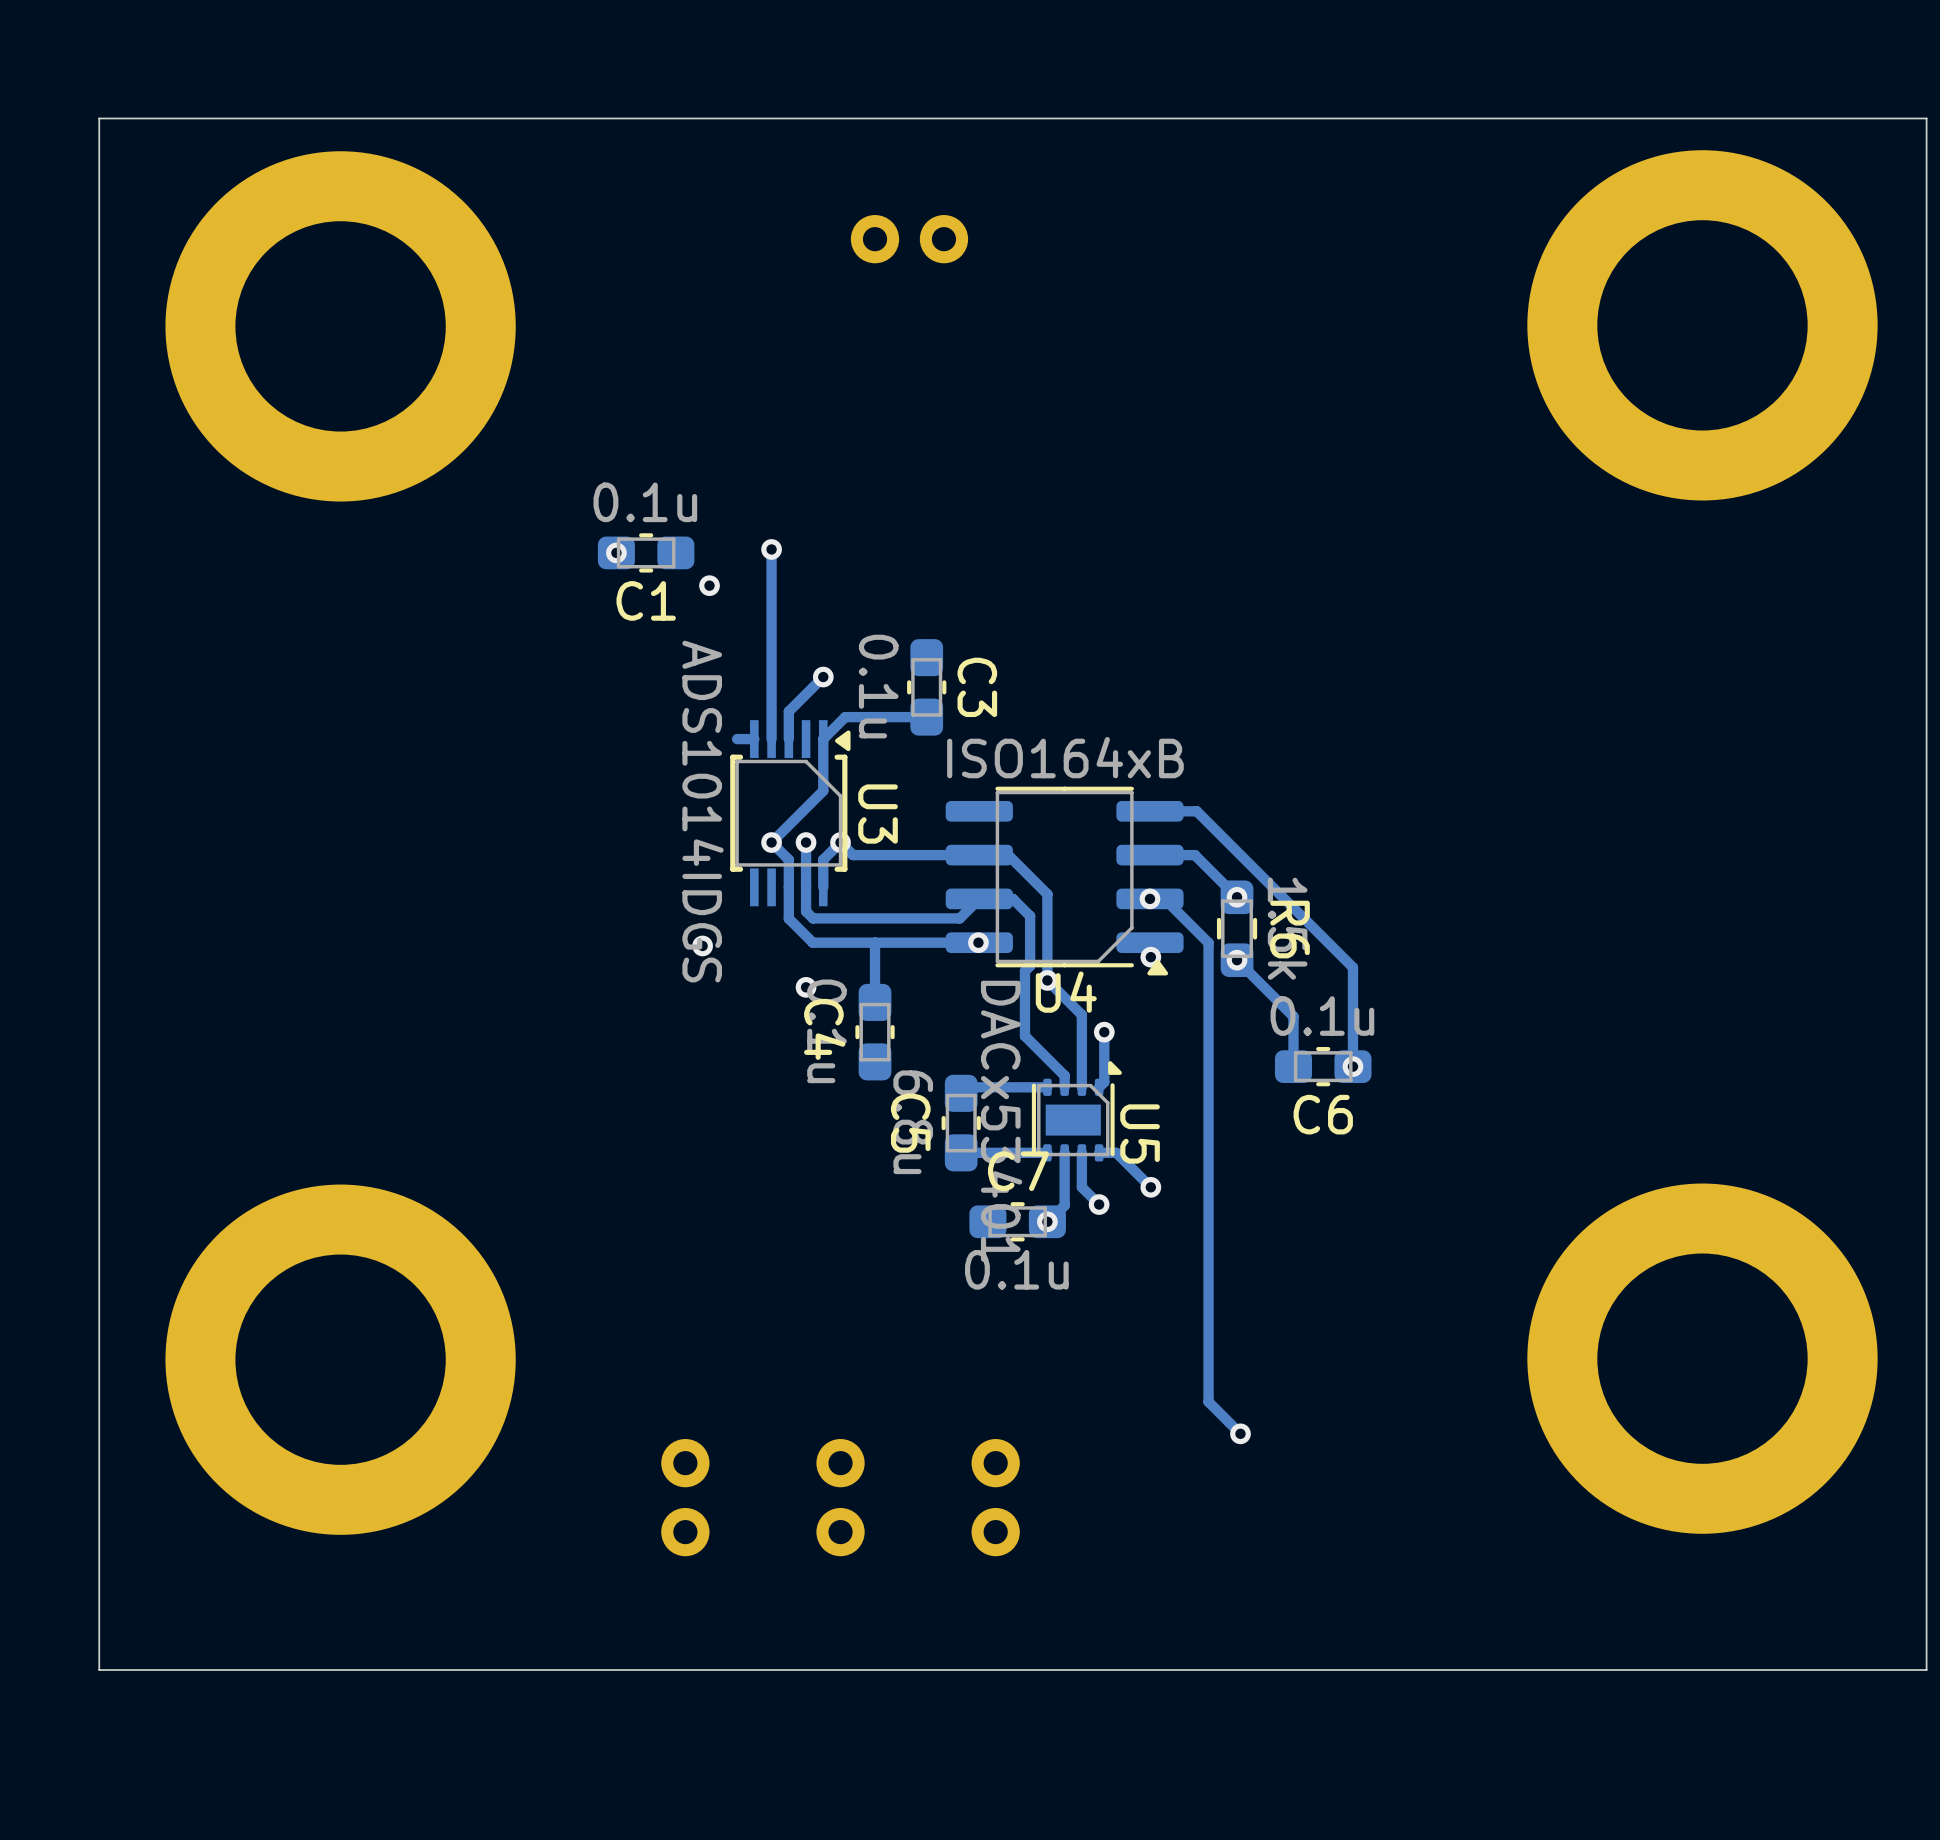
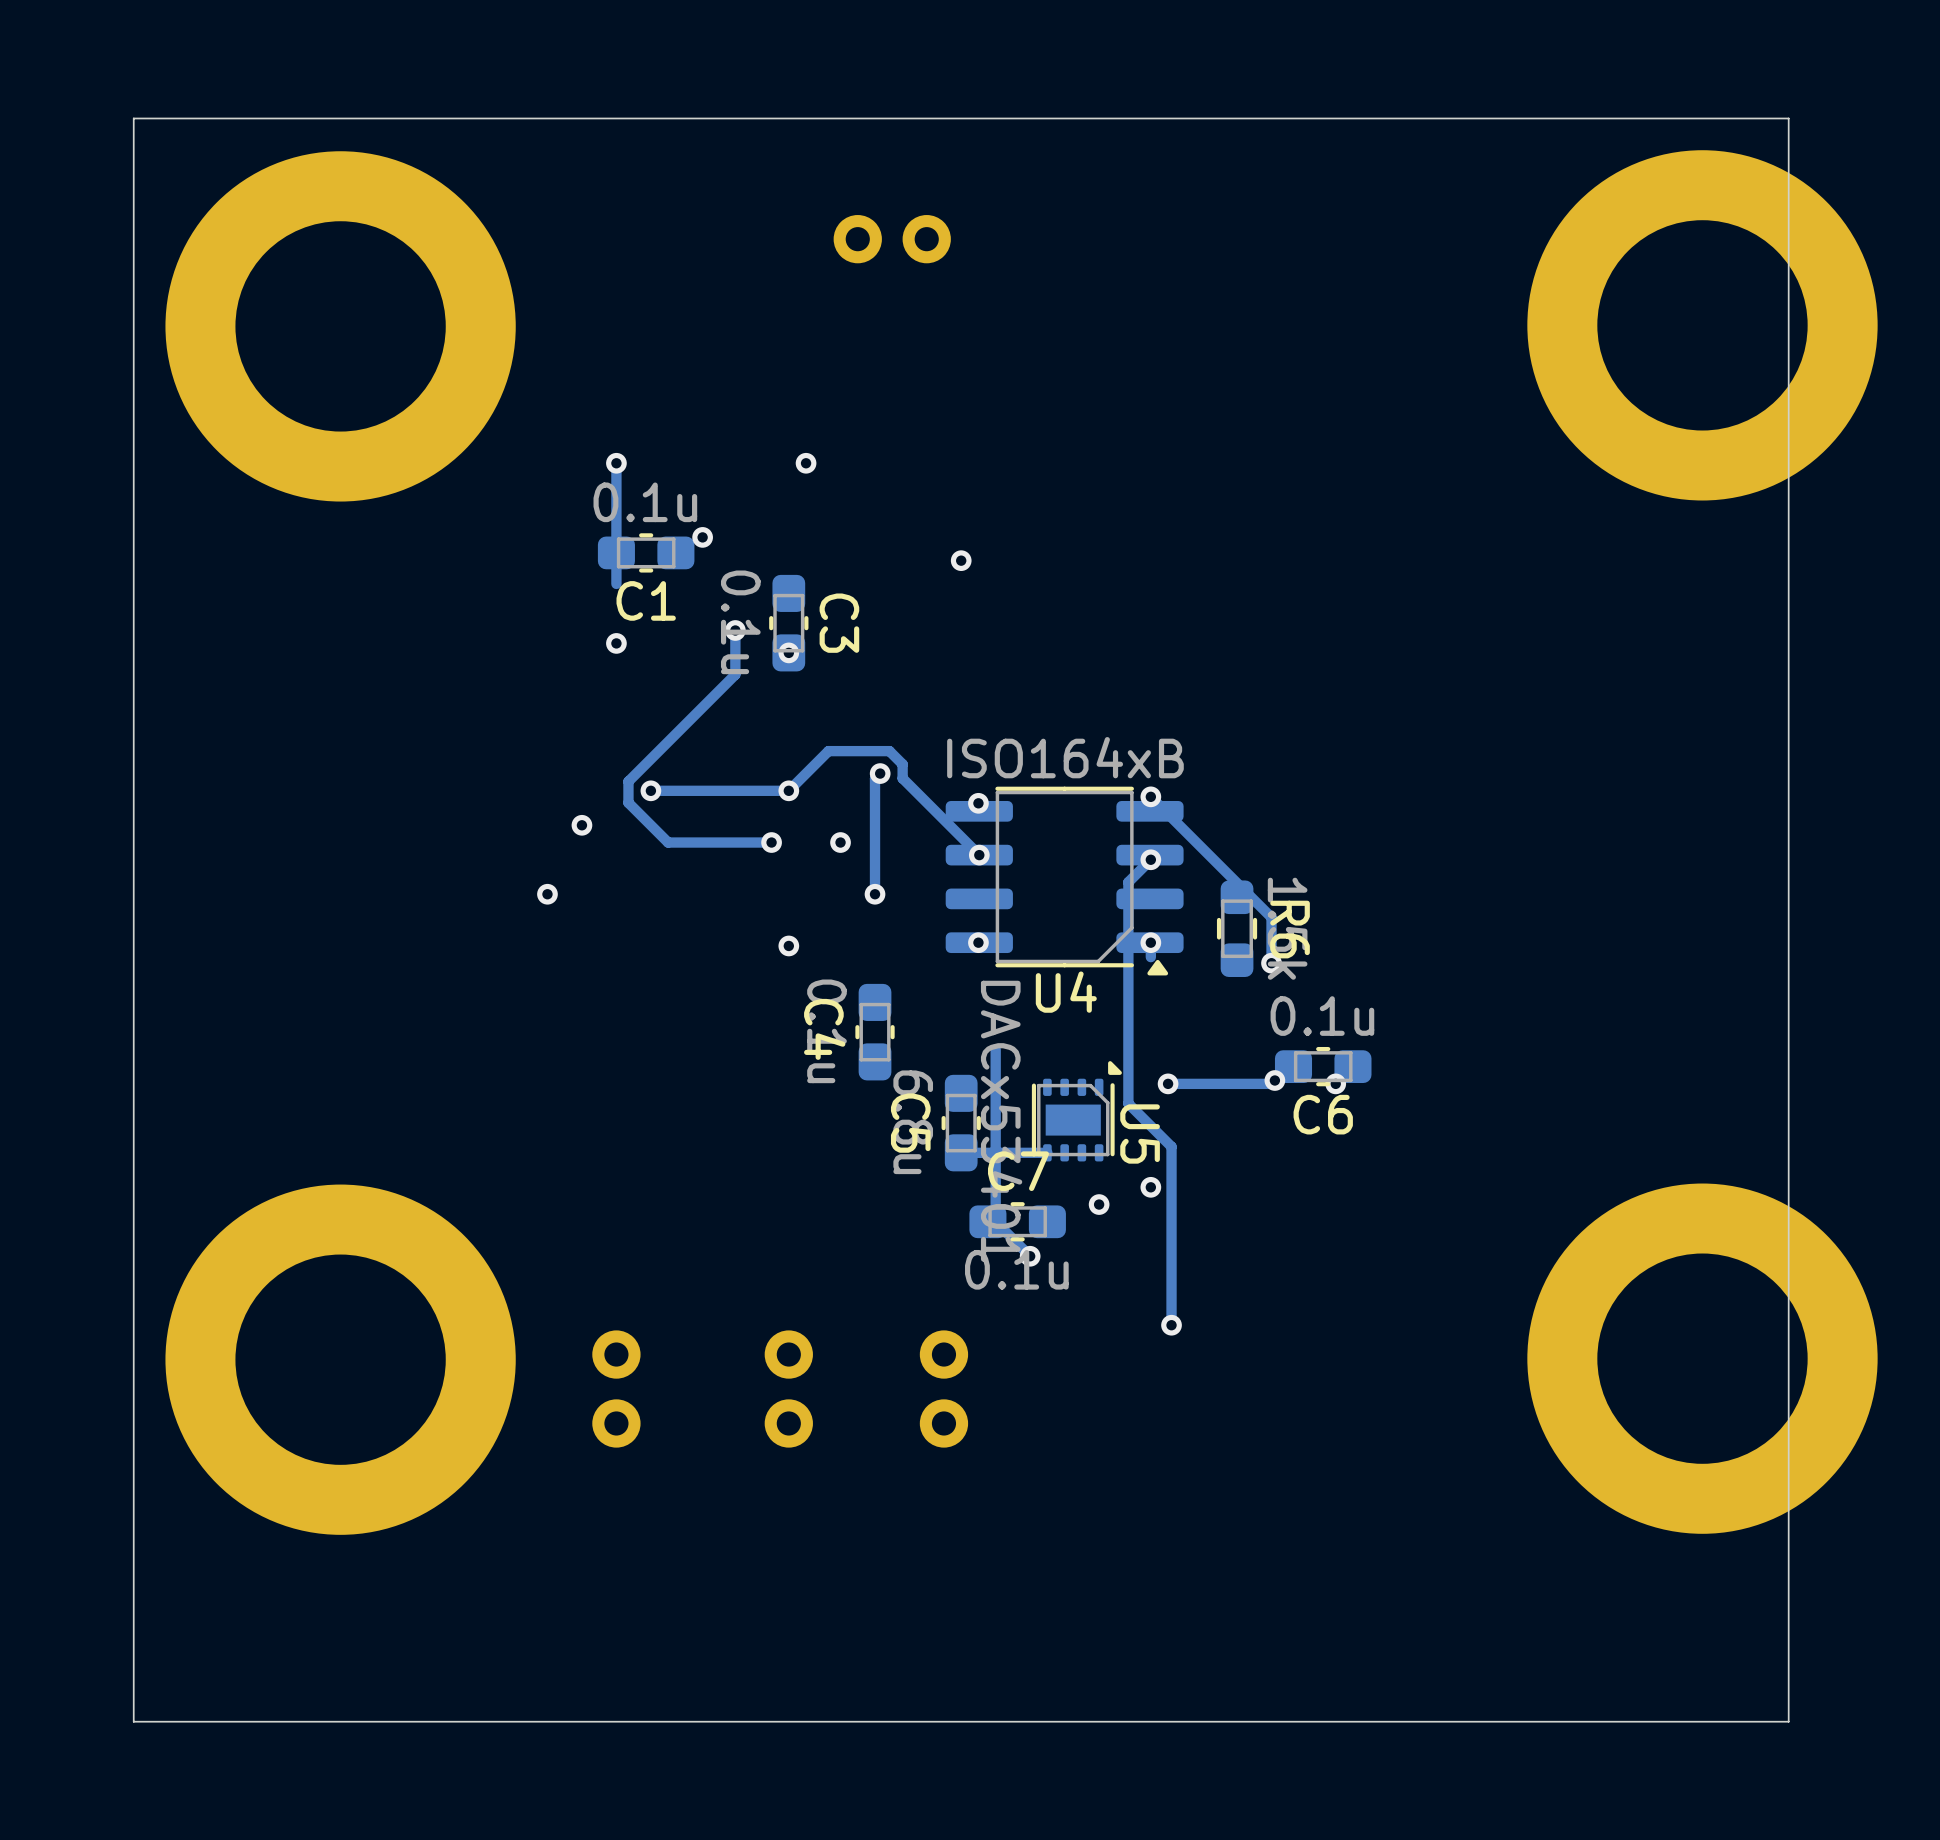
board edge: (1788, 118) (1926, 118) (1926, 1670) (99, 1670) (99, 118) (133, 118) -> (1788, 118) (1788, 1721) (133, 1721) (133, 118)
part position: (909, 239) -> (892, 239)
track: none -> (616, 463) (616, 583)
via: none -> (616, 463)
via: none -> (806, 463)
via: none -> (702, 537)
track: (771, 549) (771, 739) -> none
via: (771, 549) -> none
via: (616, 552) -> none
via: none -> (961, 560)
via: (709, 585) -> none
track: none -> (735, 630) (735, 674) (628, 781) (628, 802) (668, 842) (771, 842)
via: none -> (735, 630)
via: none -> (616, 643)
track: (823, 677) (788, 711) (788, 739) -> none
via position: (823, 677) -> (788, 652)
C3 position: (926, 687) -> (788, 623)
track: (926, 717) (845, 717) (823, 739) (823, 790) (771, 842) (788, 859) (788, 918) (812, 942) (979, 942) -> none
track: (754, 739) (737, 739) -> none
track: none -> (880, 773) (875, 778) (875, 894)
via: none -> (880, 773)
track: none -> (650, 790) (788, 790) (828, 751) (889, 751) (902, 764) (902, 778) (979, 855)
via: none -> (650, 790)
via: none -> (788, 790)
track: none -> (1150, 796) (1271, 917) (1271, 963)
via: none -> (1150, 796)
via: none -> (978, 803)
track: (1149, 811) (1196, 811) (1352, 967) (1352, 1066) -> none
U3: ADS1014IDGS (790, 813) -> none
via: none -> (581, 825)
track: (806, 842) (806, 911) (812, 918) (959, 918) (979, 898) (1012, 898) (1030, 916) (1030, 965) (1024, 971) (1024, 1036) (1064, 1075) (1064, 1087) -> none
via: (806, 842) -> none
via: none -> (979, 855)
track: (1149, 855) (1194, 855) (1237, 897) -> none
track: none -> (1150, 859) (1128, 882) (1128, 1103) (1171, 1146) (1171, 1325)
via: none -> (1150, 859)
track: (823, 887) (823, 859) (840, 842) (853, 855) (1008, 855) (1047, 894) (1047, 980) (1081, 1014) (1081, 1087) -> none
via: none -> (547, 894)
via: none -> (875, 894)
via: (1237, 897) -> none
track: (1149, 898) (1164, 898) (1208, 942) (1208, 1401) (1240, 1433) -> none
via: (1149, 898) -> none
track: (875, 942) (875, 1002) -> none
via: (702, 945) -> none
via: none -> (788, 945)
via position: (1150, 957) -> (1150, 942)
track: (1237, 960) (1293, 1016) (1293, 1066) -> none
via position: (1237, 960) -> (1271, 963)
via: (1047, 980) -> none
via: (806, 987) -> none
track: (1104, 1032) (1104, 1082) (1099, 1087) -> none
via: (1104, 1032) -> none
track: none -> (995, 1049) (995, 1221) (1030, 1256)
via position: (1352, 1066) -> (1335, 1083)
track: none -> (1274, 1080) (1271, 1083) (1168, 1083)
via: none -> (1274, 1080)
via: none -> (1168, 1083)
track: (1047, 1087) (967, 1087) (961, 1093) -> none
track: (1064, 1152) (1064, 1205) (1045, 1224) -> none
track: (1081, 1152) (1081, 1187) (1099, 1204) -> none
track: (1099, 1152) (1116, 1152) (1150, 1187) -> none
via position: (1047, 1221) -> (1030, 1256)
via: none -> (1171, 1325)
part: none -> (616, 1389)
part: none -> (788, 1389)
part: none -> (943, 1389)
via: (1240, 1433) -> none
part: (685, 1497) -> none
part: (840, 1497) -> none
part: (995, 1497) -> none

